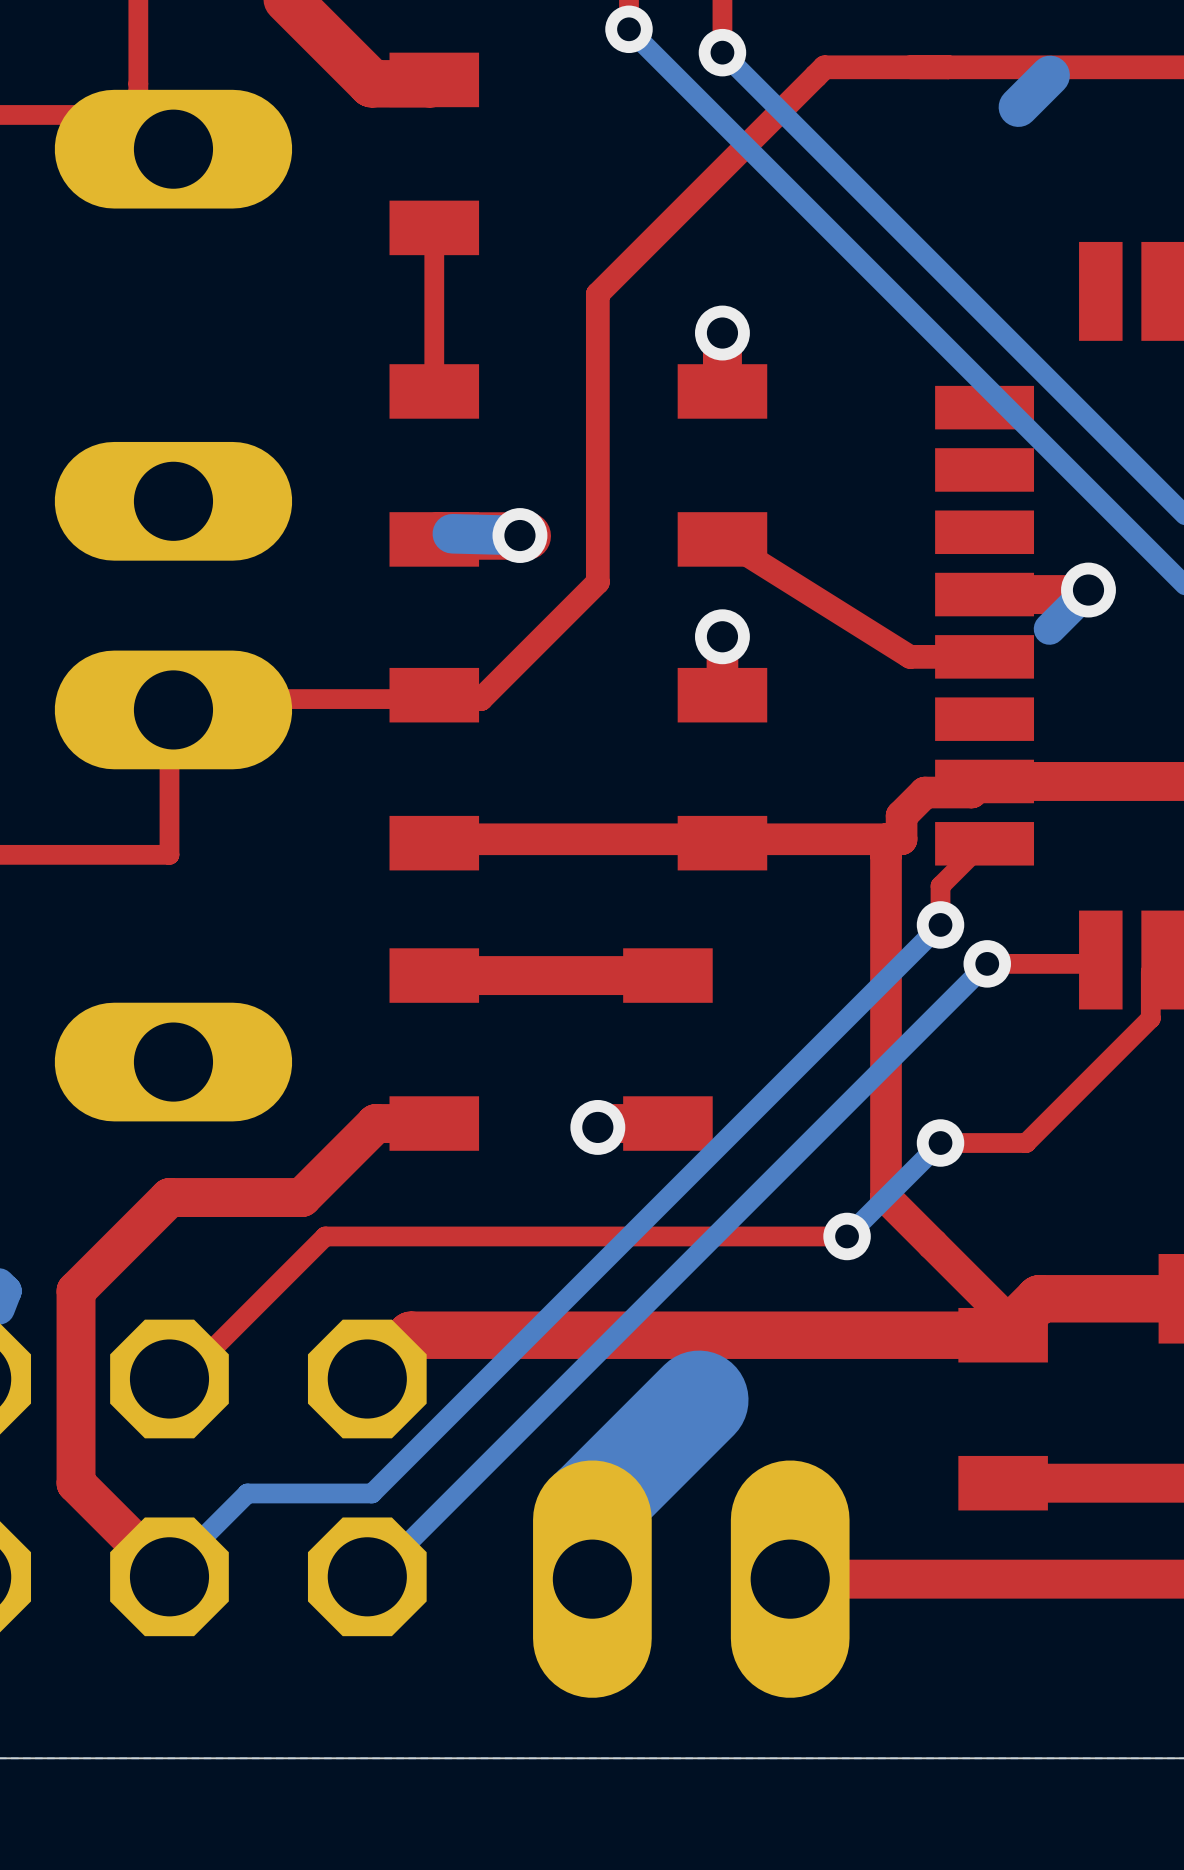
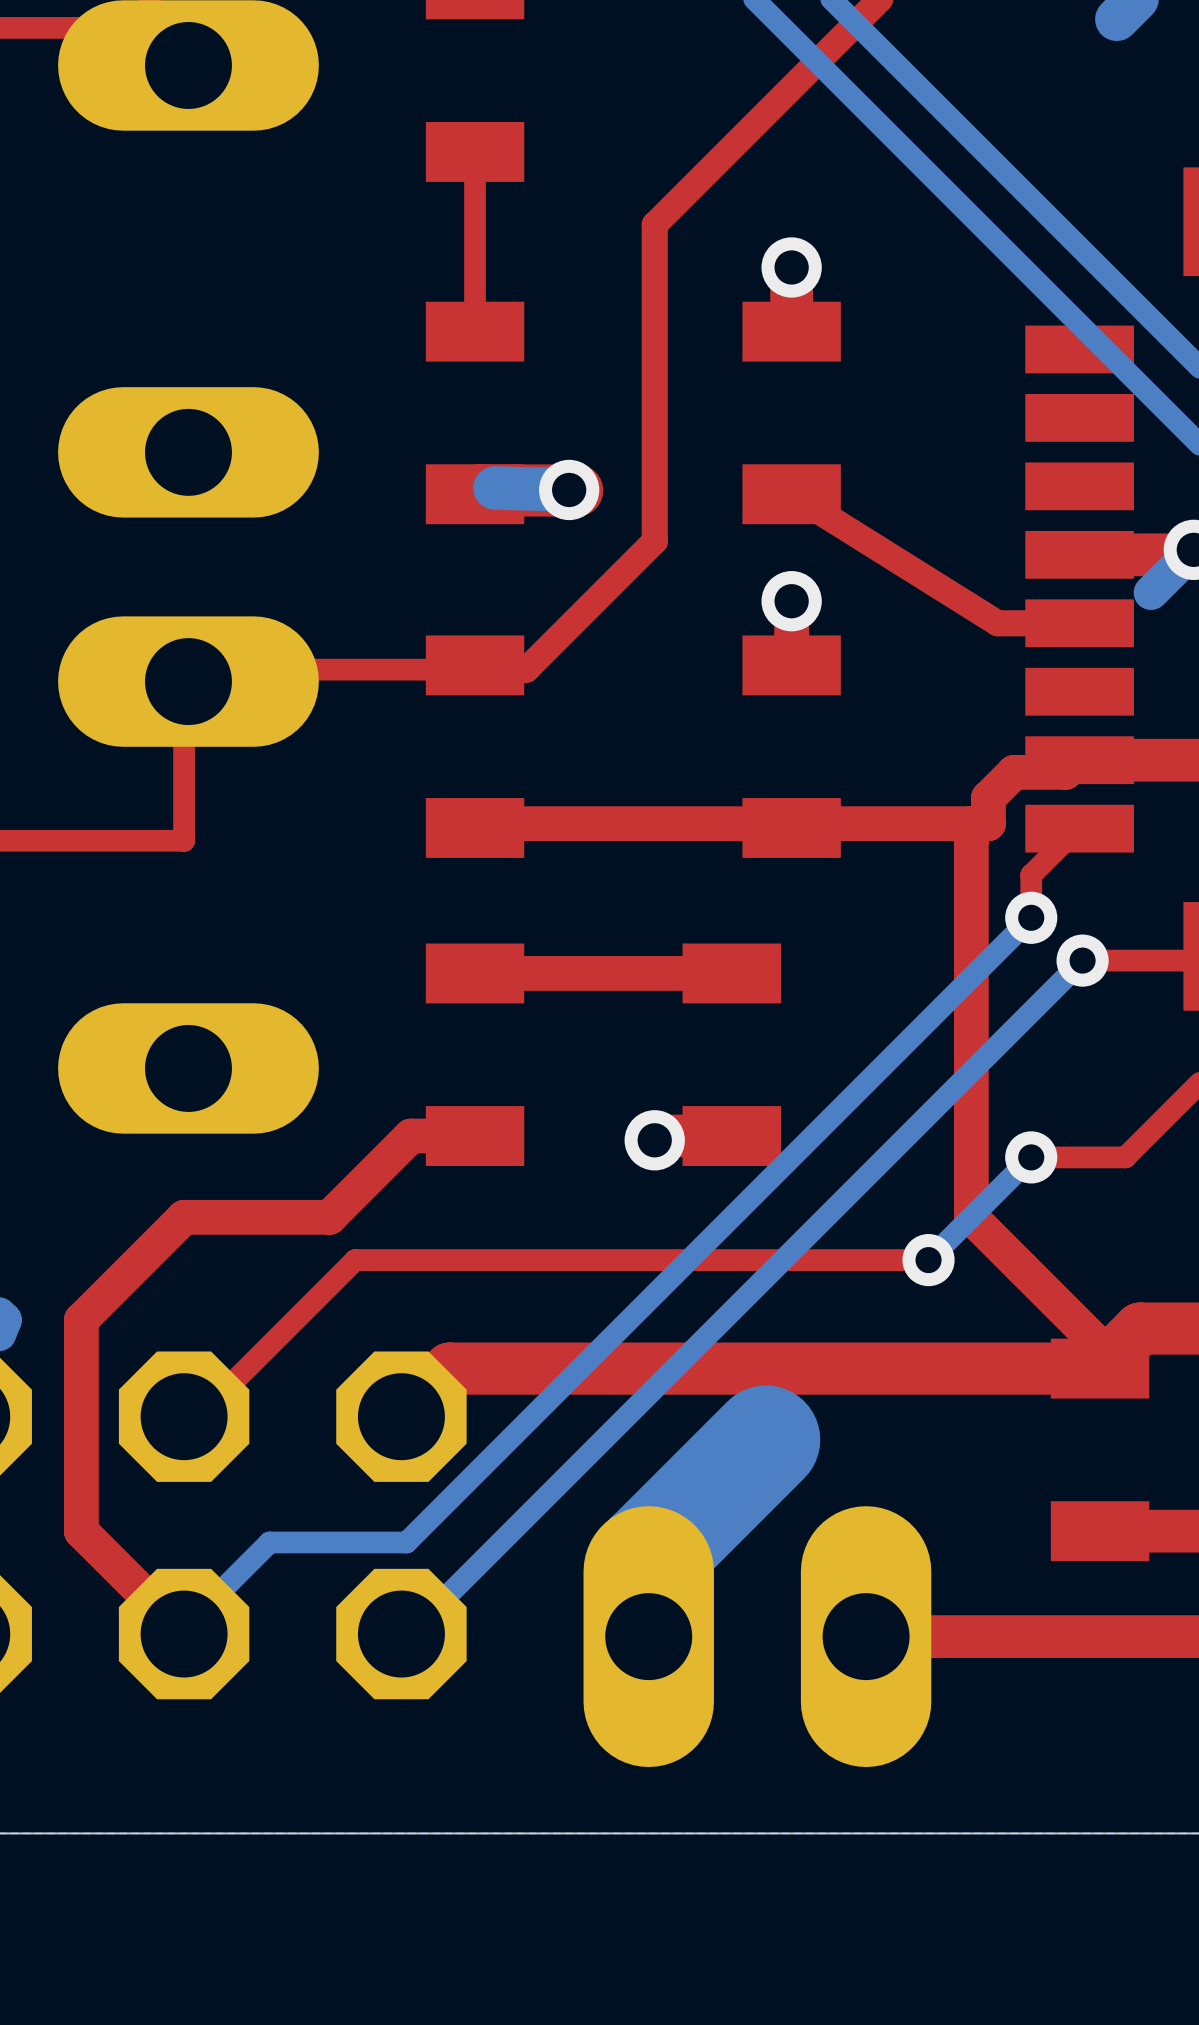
top track width: thick (667, 975) (434, 975) -> thin (731, 973) (475, 973)
top track width: thick (434, 1123) (375, 1123) (301, 1197) (169, 1197) (76, 1290) (76, 1483) (169, 1576) -> thin (475, 1136) (410, 1136) (329, 1217) (184, 1217) (81, 1319) (81, 1531) (184, 1634)

